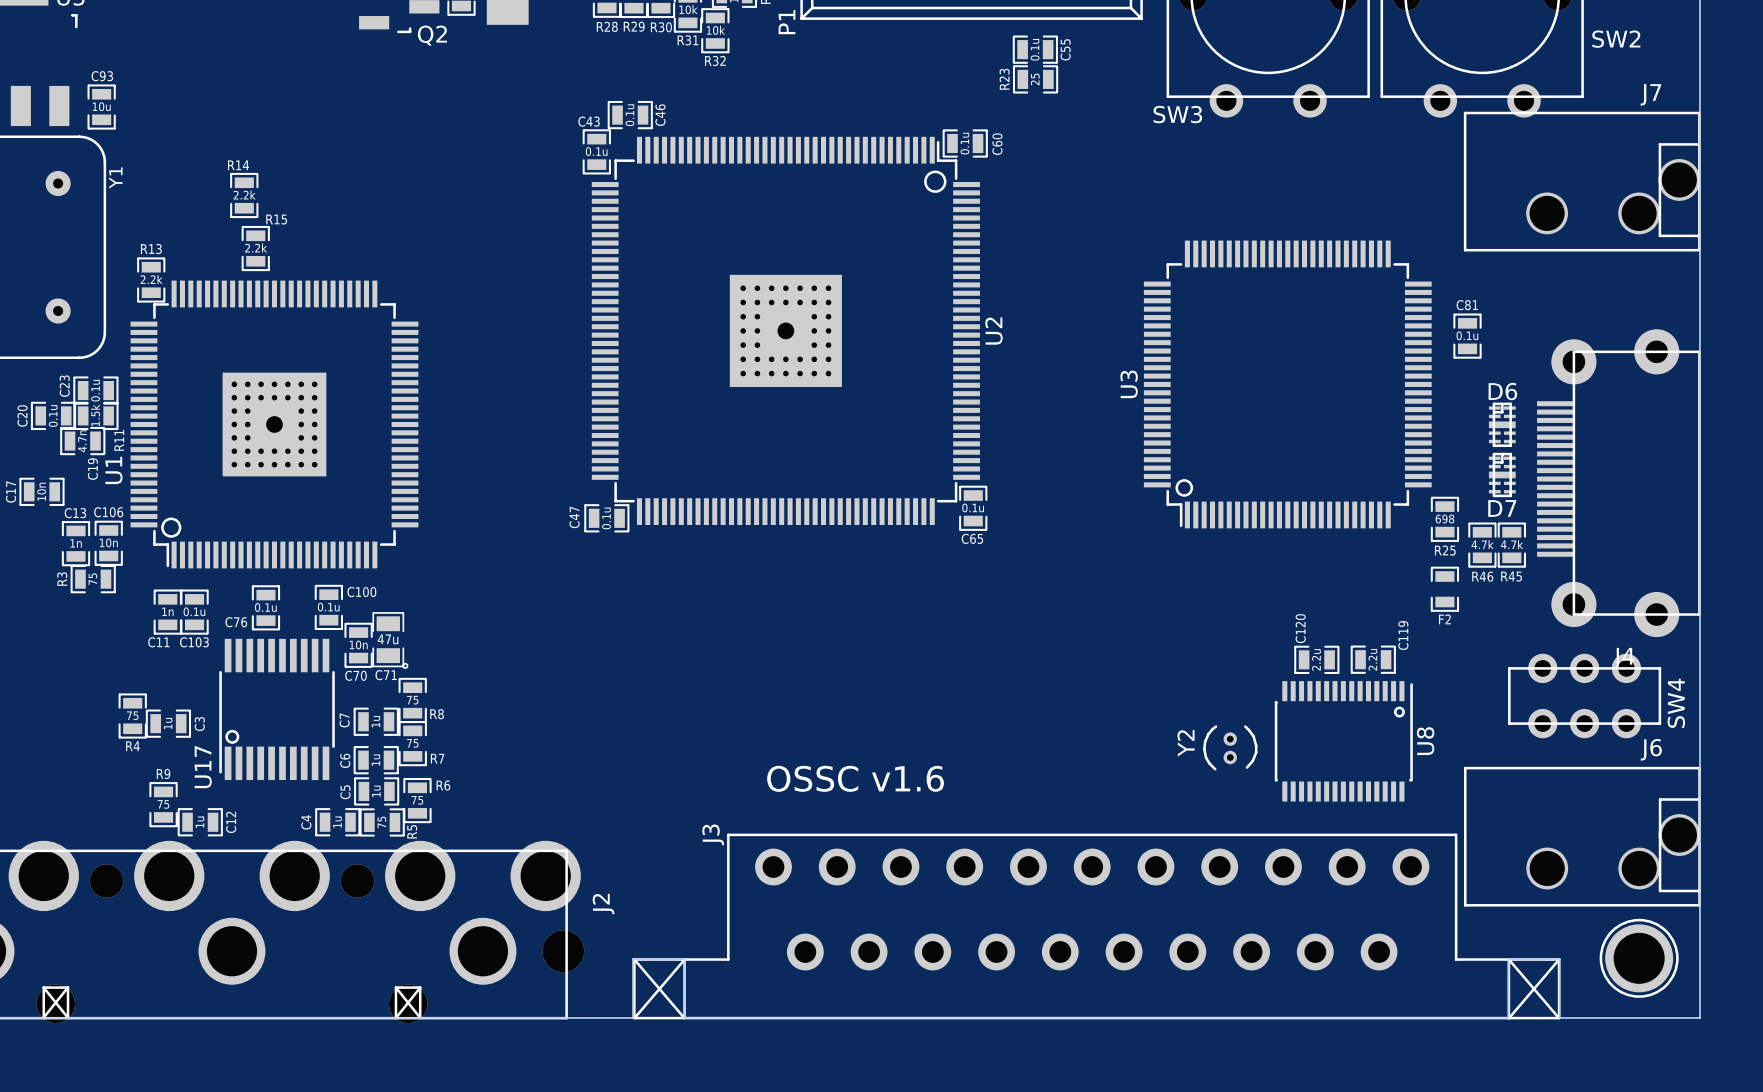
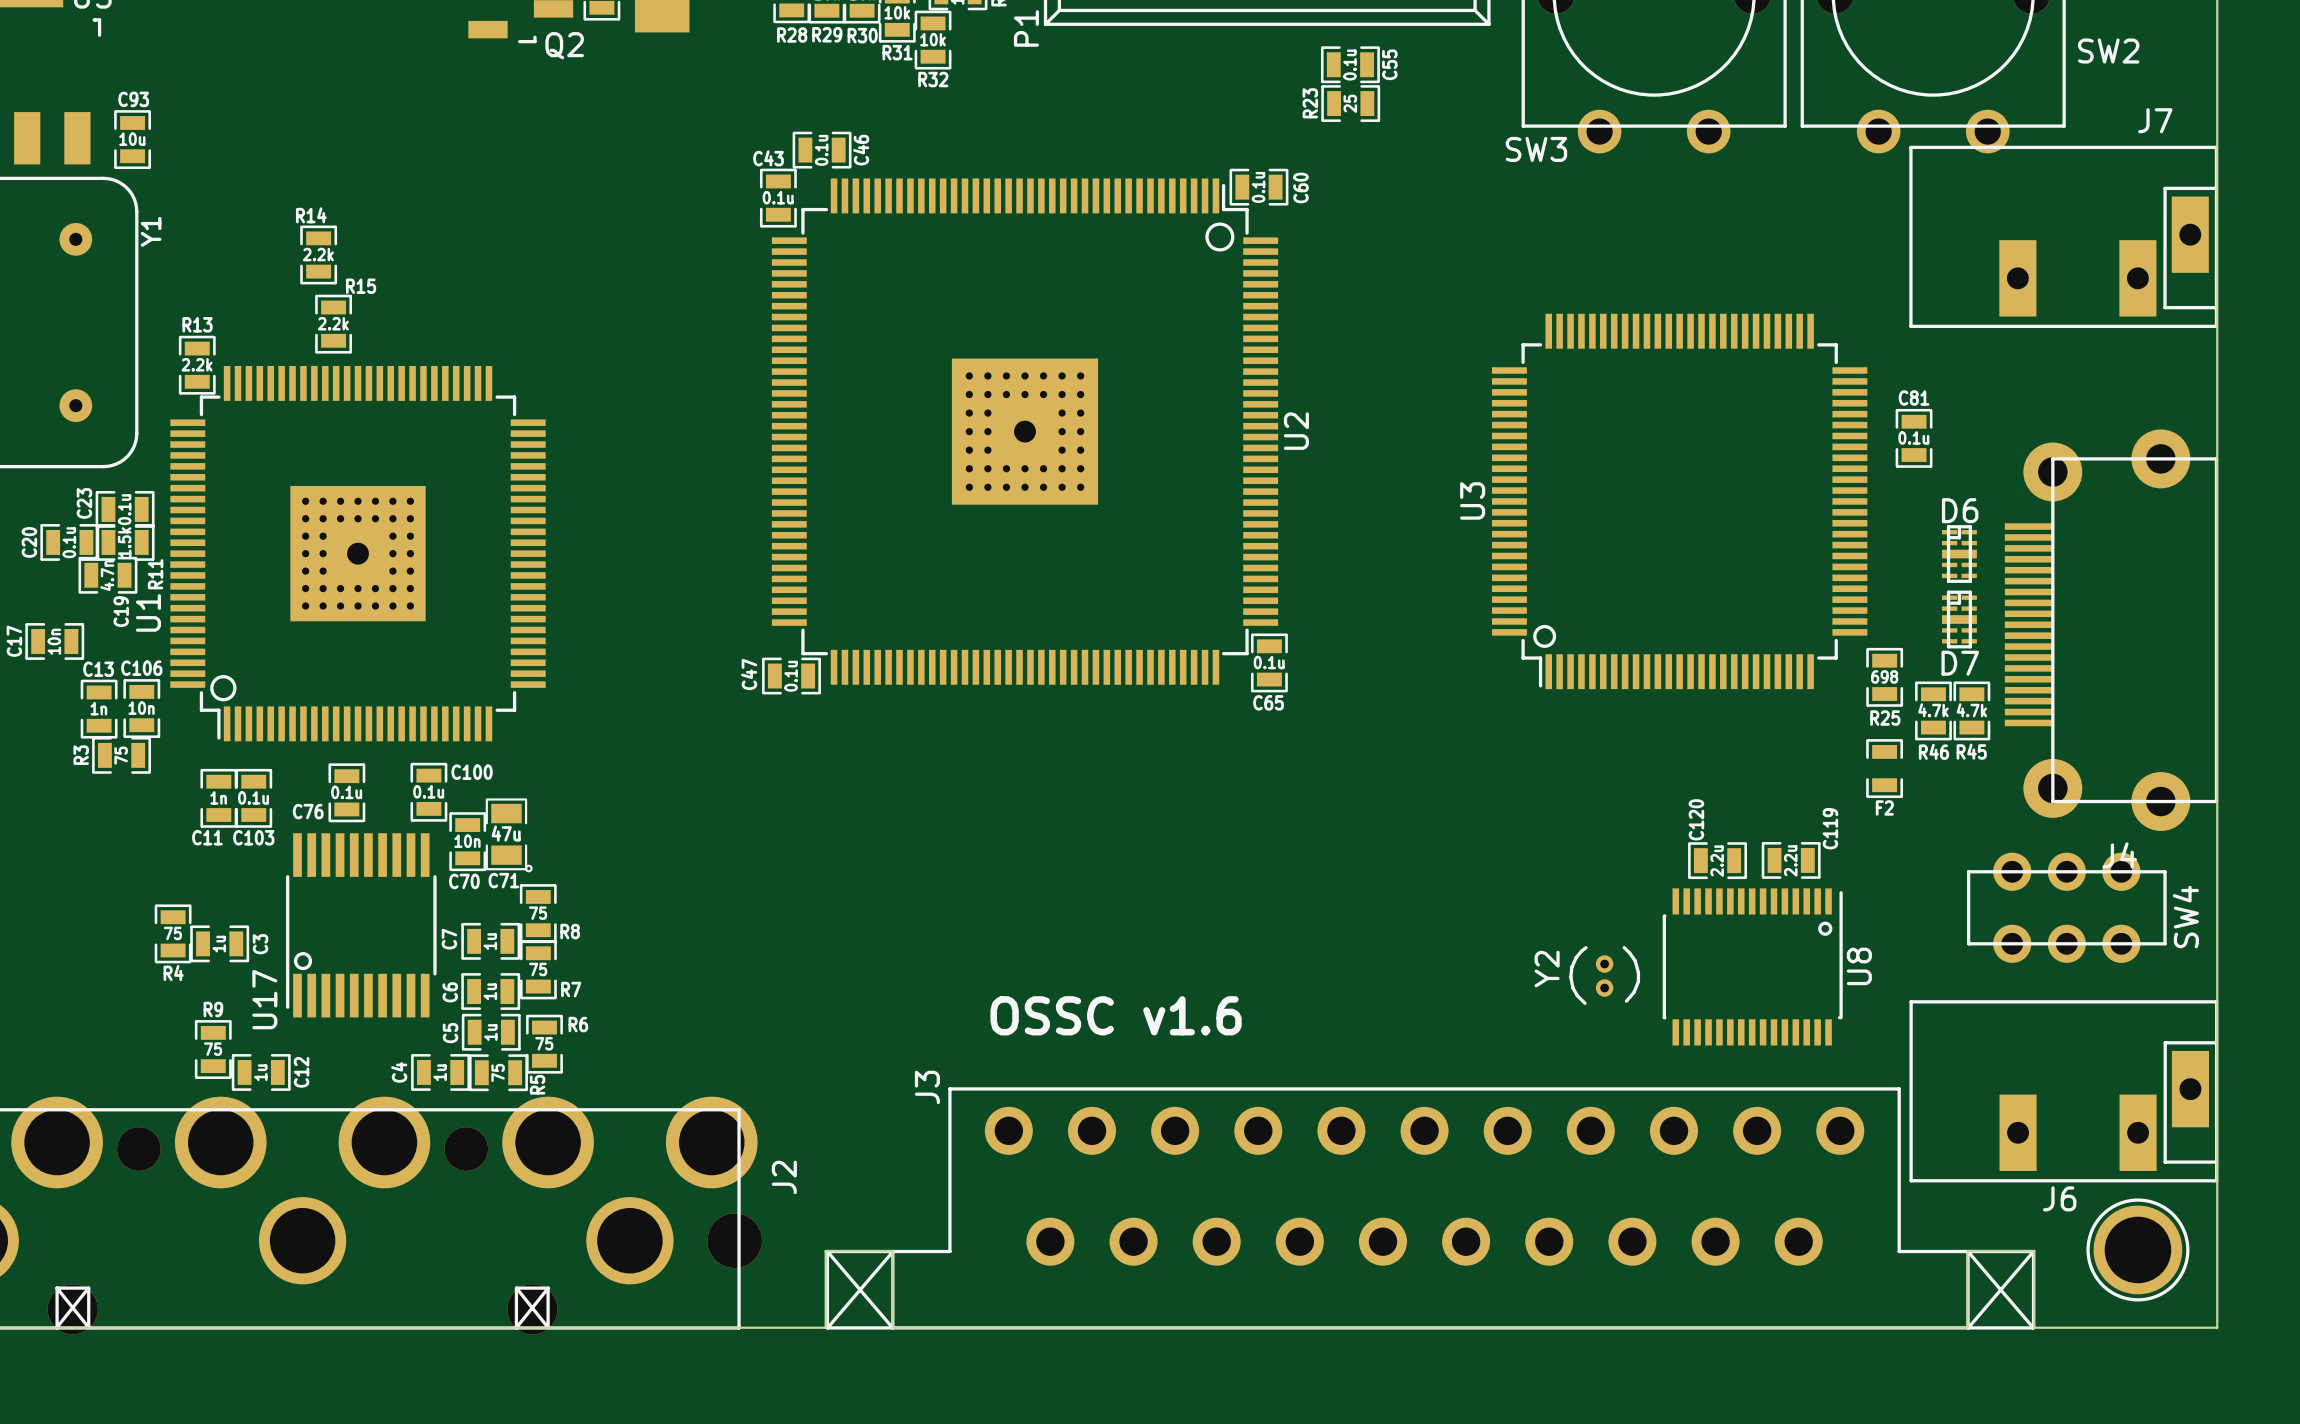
J7 footprint: [1463, 111, 1701, 252] -> [1909, 145, 2219, 328]
J6 name position: J6 (1651, 749) -> J6 (2059, 1198)
J6 footprint: [1464, 766, 1701, 907] -> [1909, 1000, 2219, 1183]

